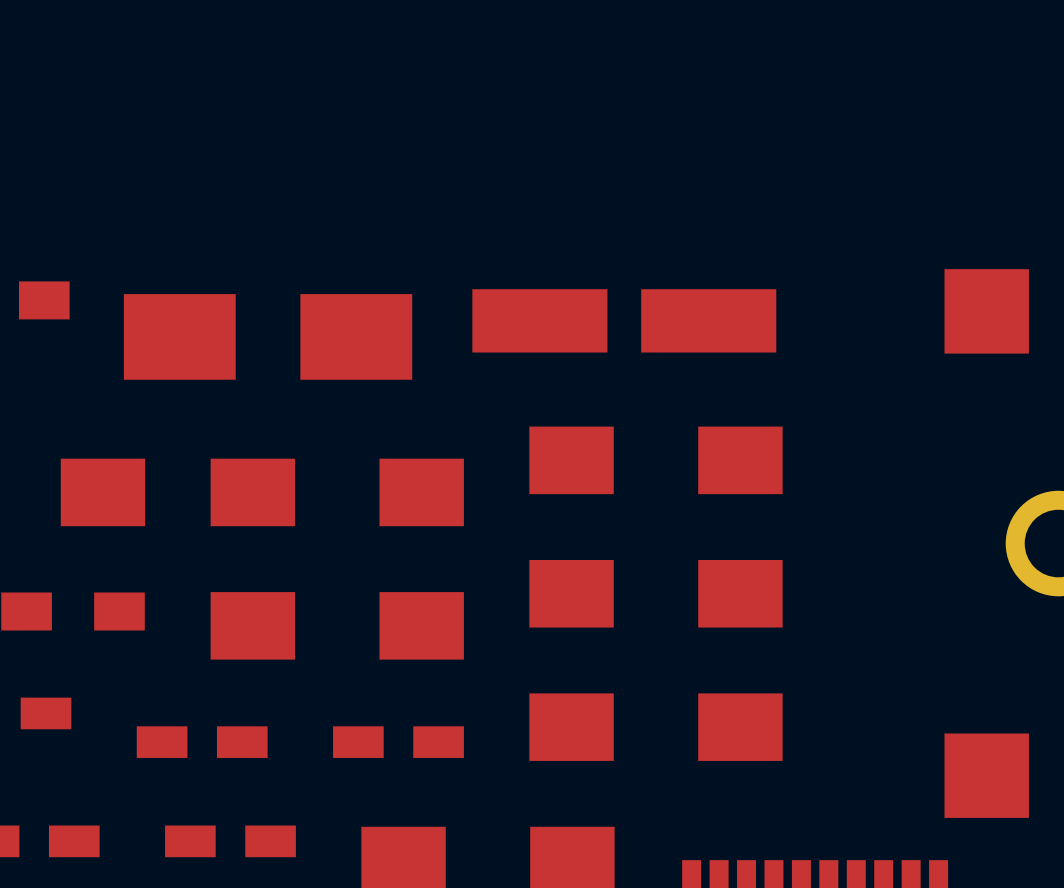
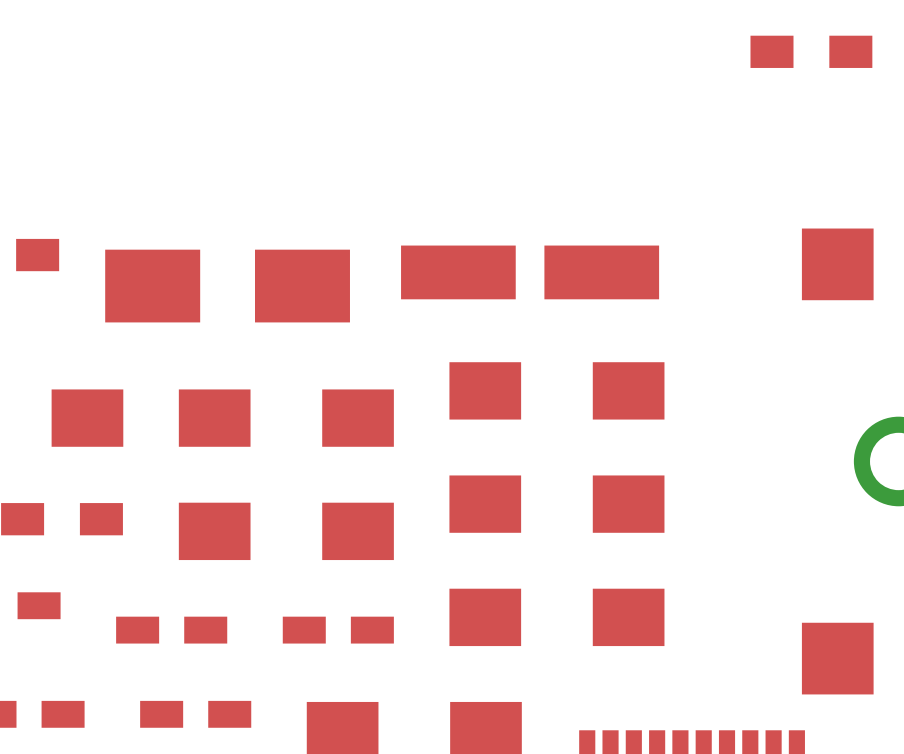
part: none -> (811, 51)

